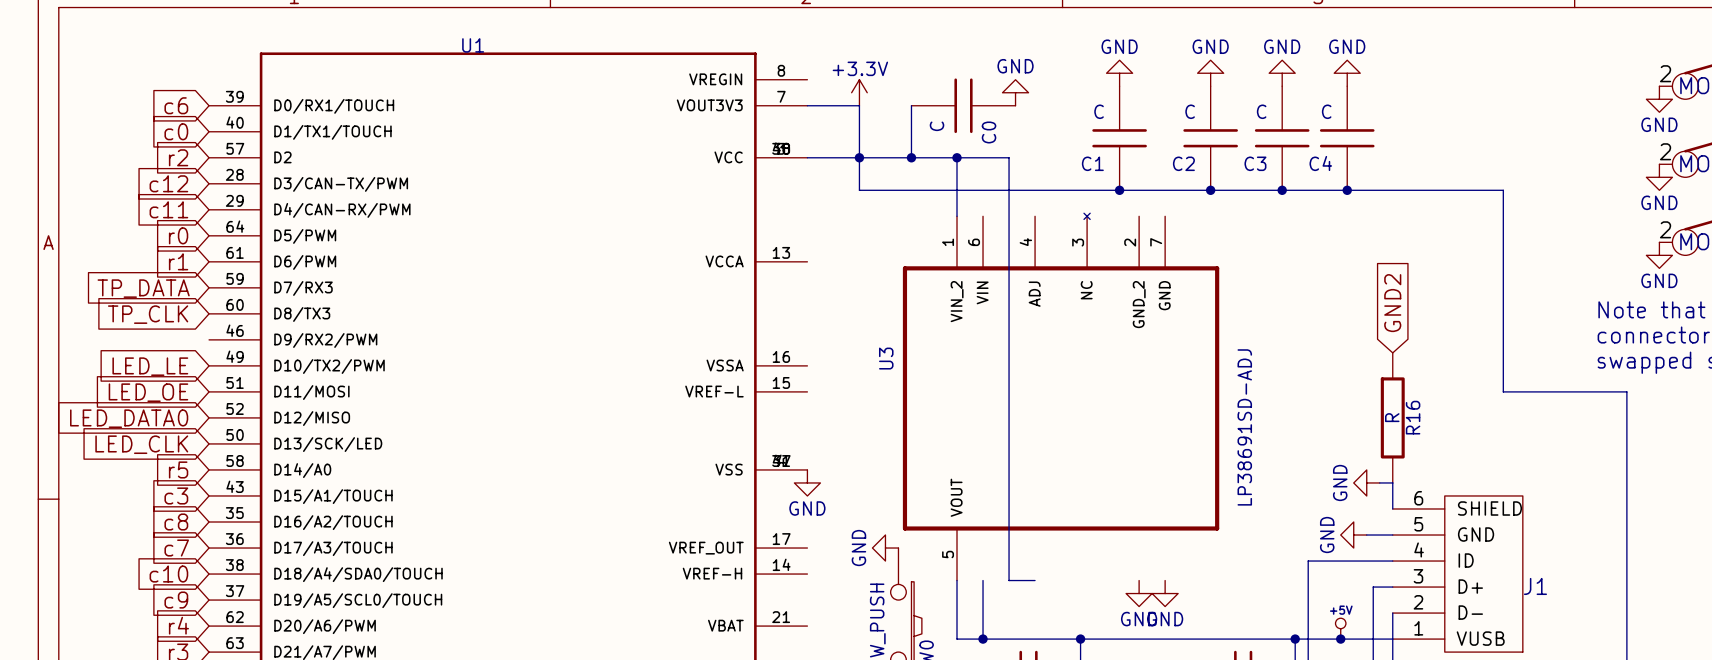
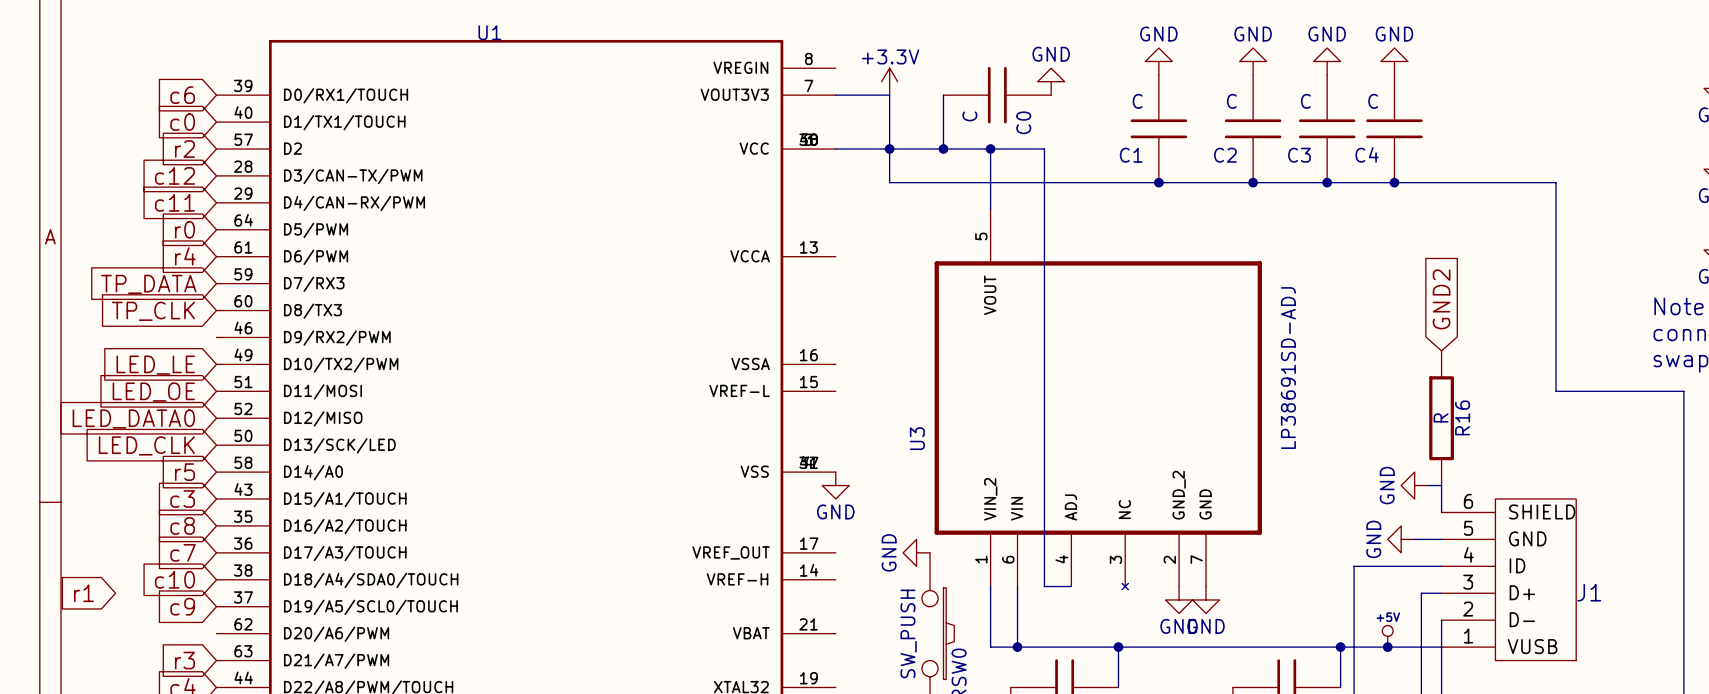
global label: r1 (178, 261) -> r4 (185, 256)
U3 flip: as is (1061, 371) -> up-down (1098, 425)
global label: none -> r1 (84, 593)
global label: r4 (178, 625) -> none

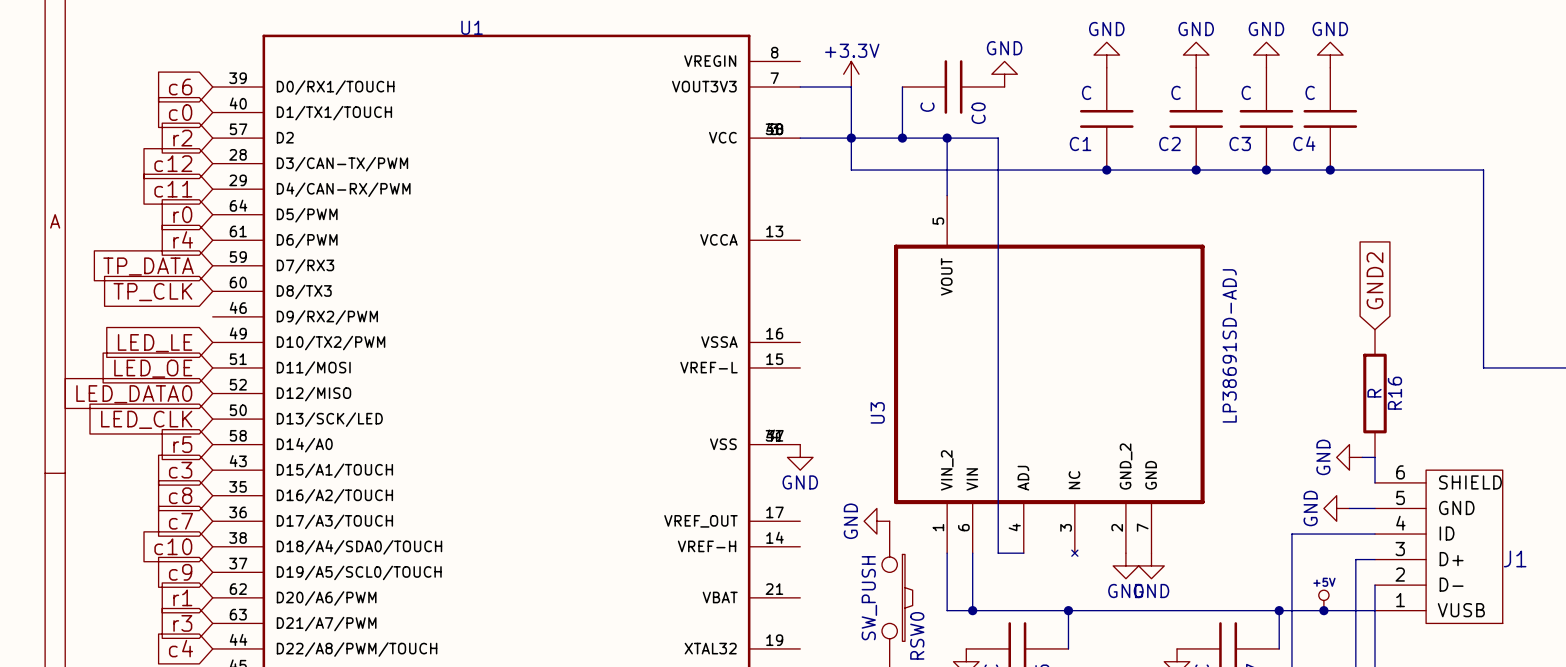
global label position: r1 (84, 593) -> r1 (182, 597)

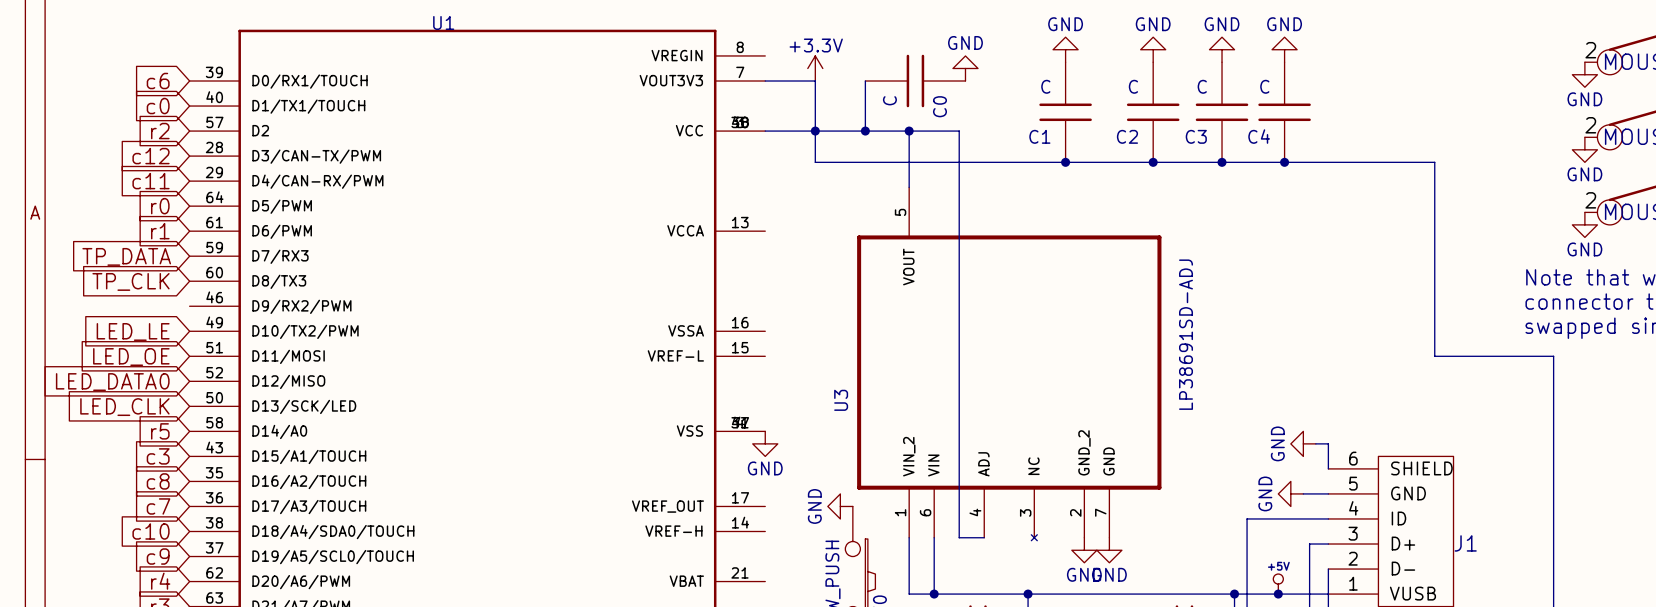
global label: r4 (183, 239) -> r1 (160, 231)
global label: GND2 (1375, 280) -> none
R16: R (1375, 393) -> none
global label: r1 (182, 597) -> r4 (160, 581)

